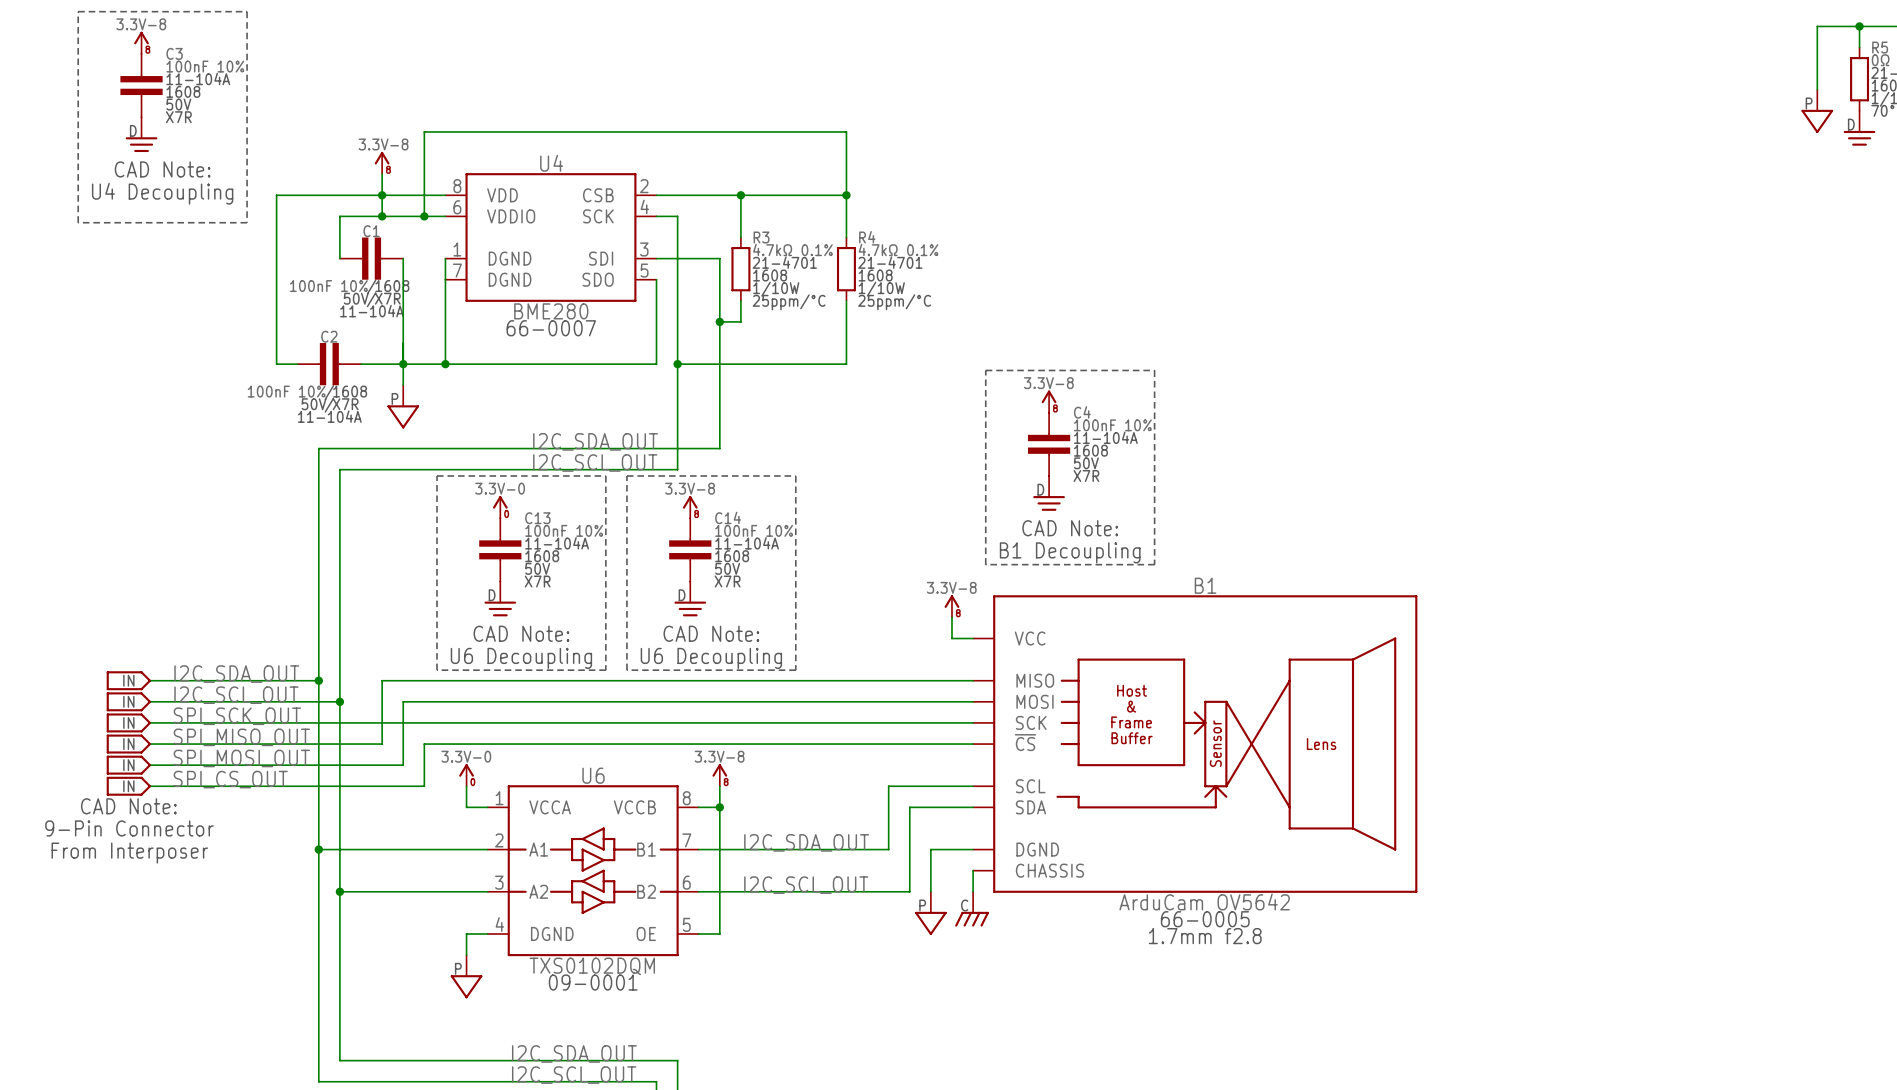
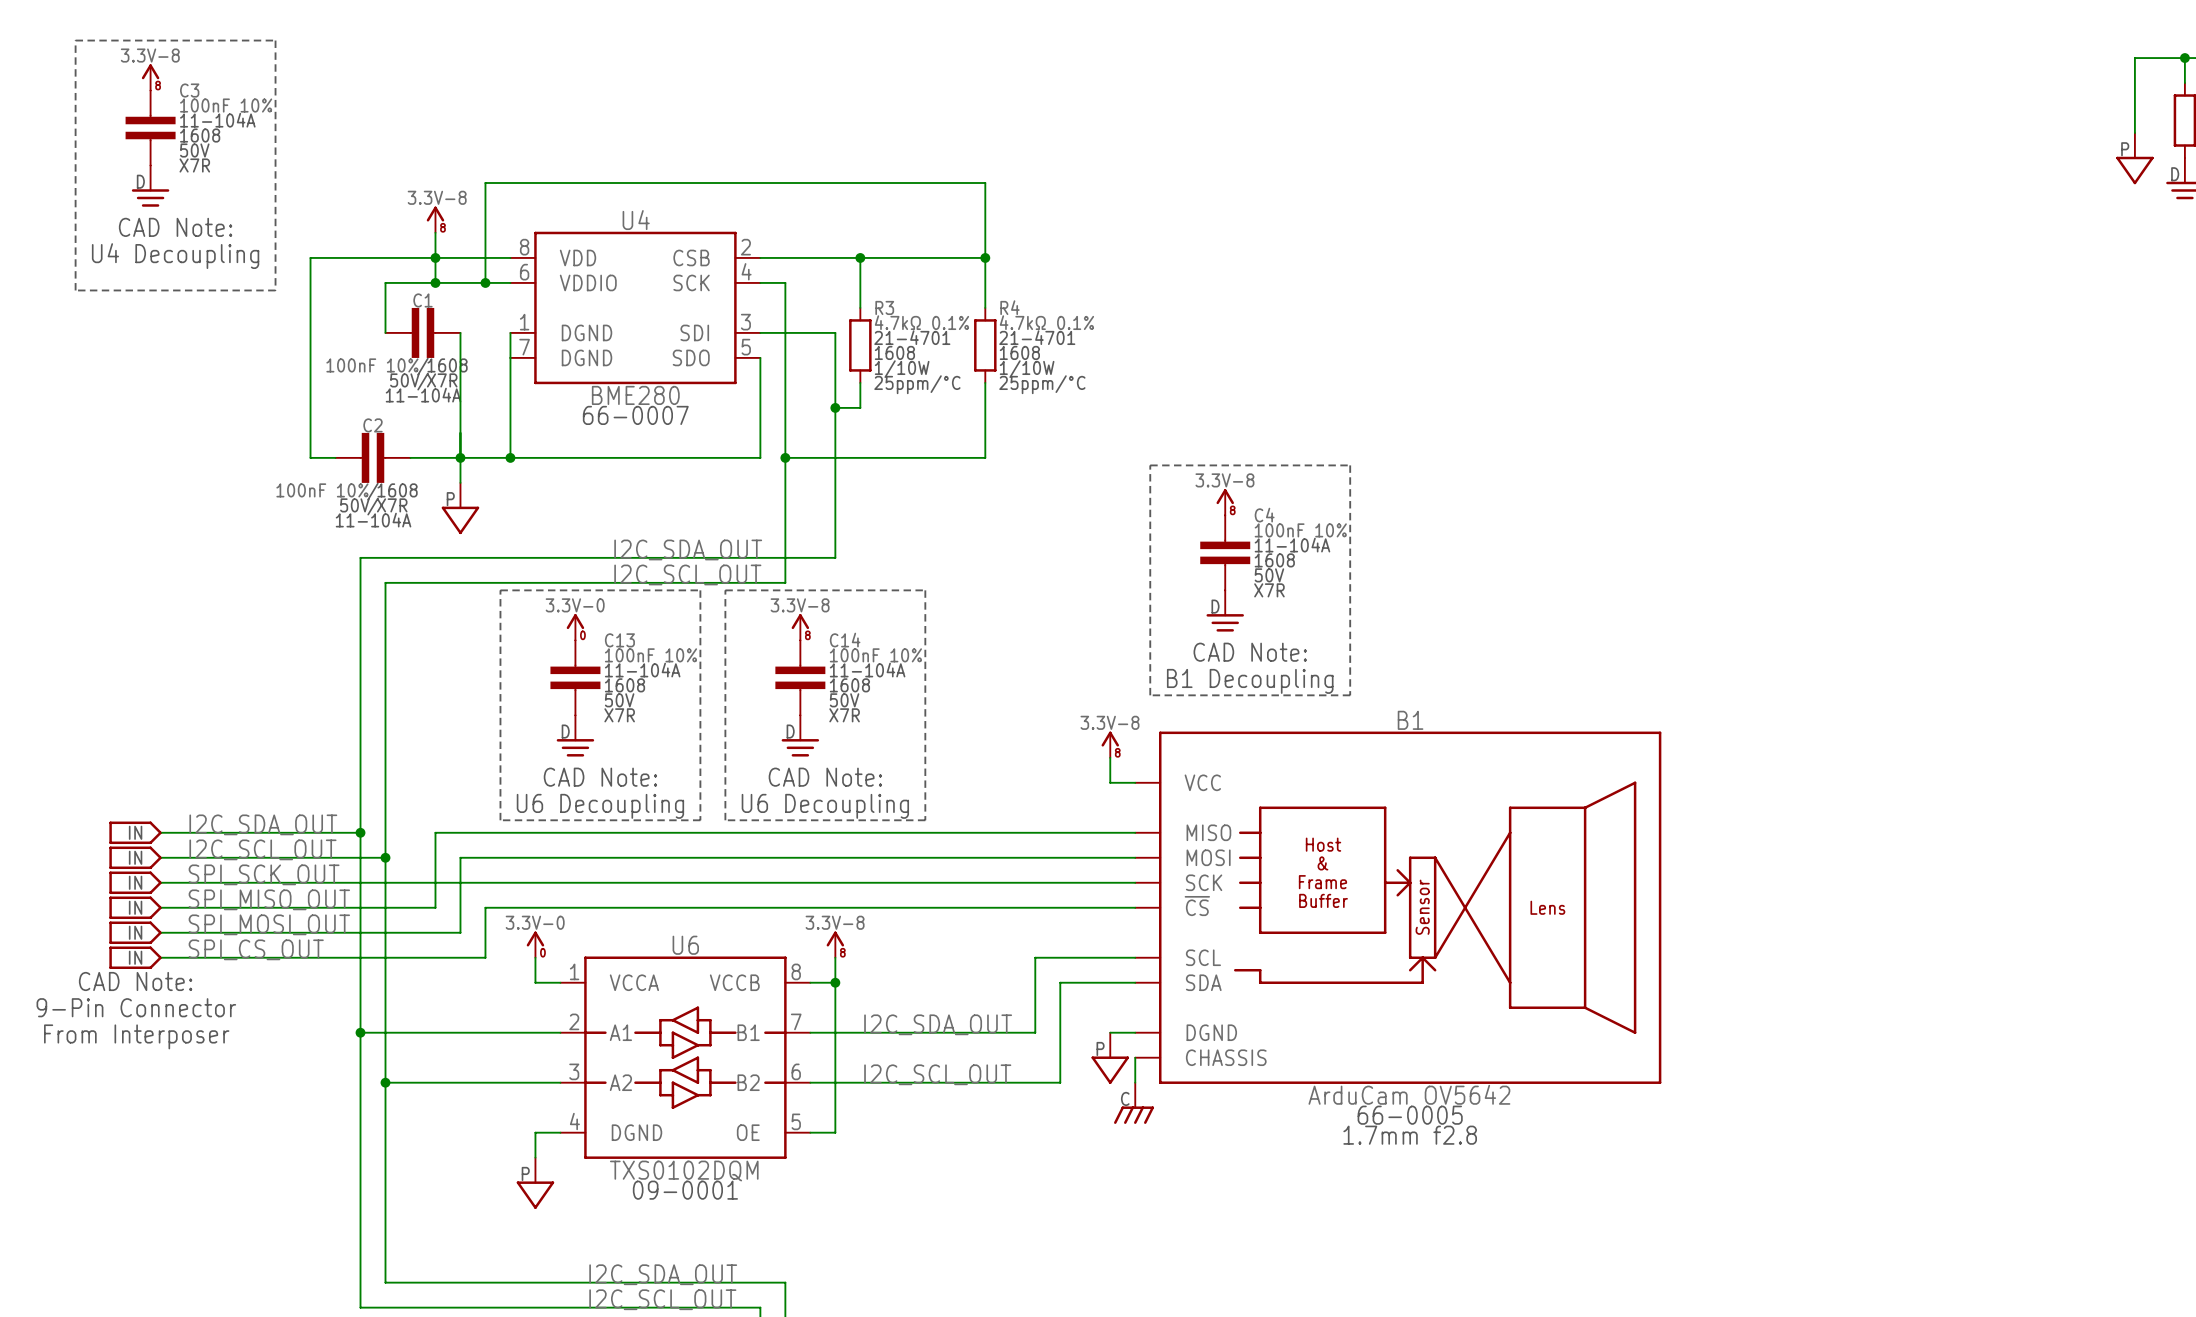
wire: (951, 849) (930, 849) (930, 891) -> none
power symbol position: (930, 913) -> (1110, 1058)

